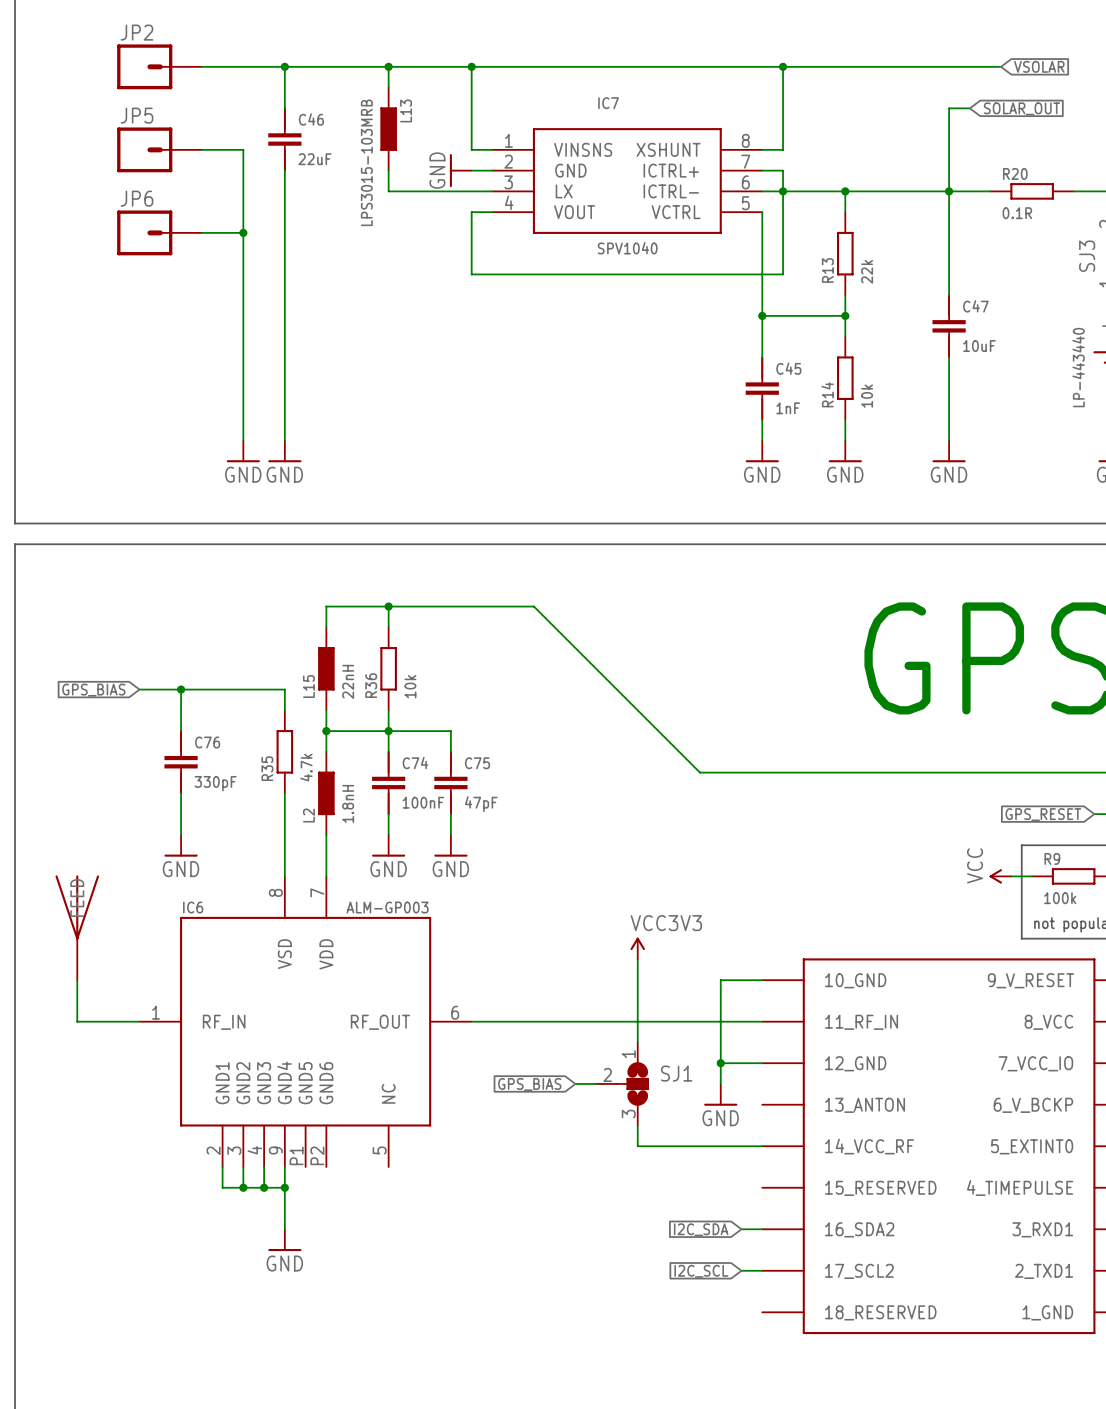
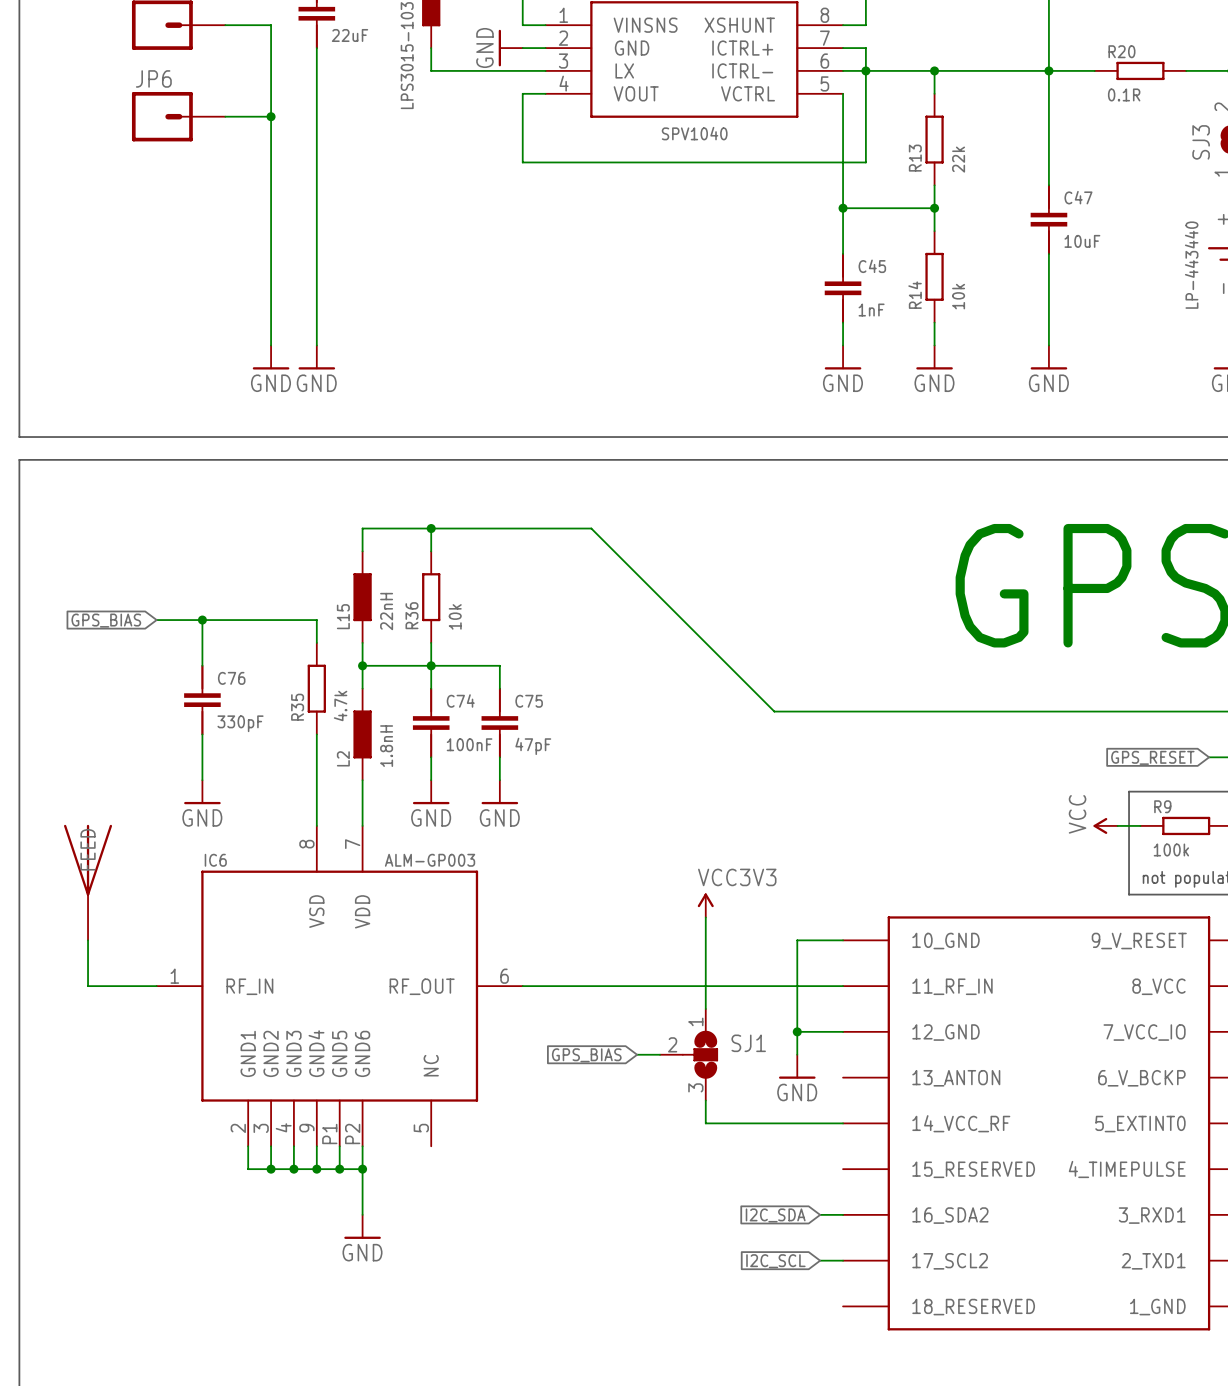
wire: none -> (339, 1146) (339, 1169)
wire: none -> (362, 1146) (362, 1214)
wire: (284, 1187) (284, 1229) -> (316, 1169) (362, 1169)
junction: none -> (339, 1169)
junction: none -> (362, 1169)
power symbol position: GND (284, 1240) -> GND (362, 1226)

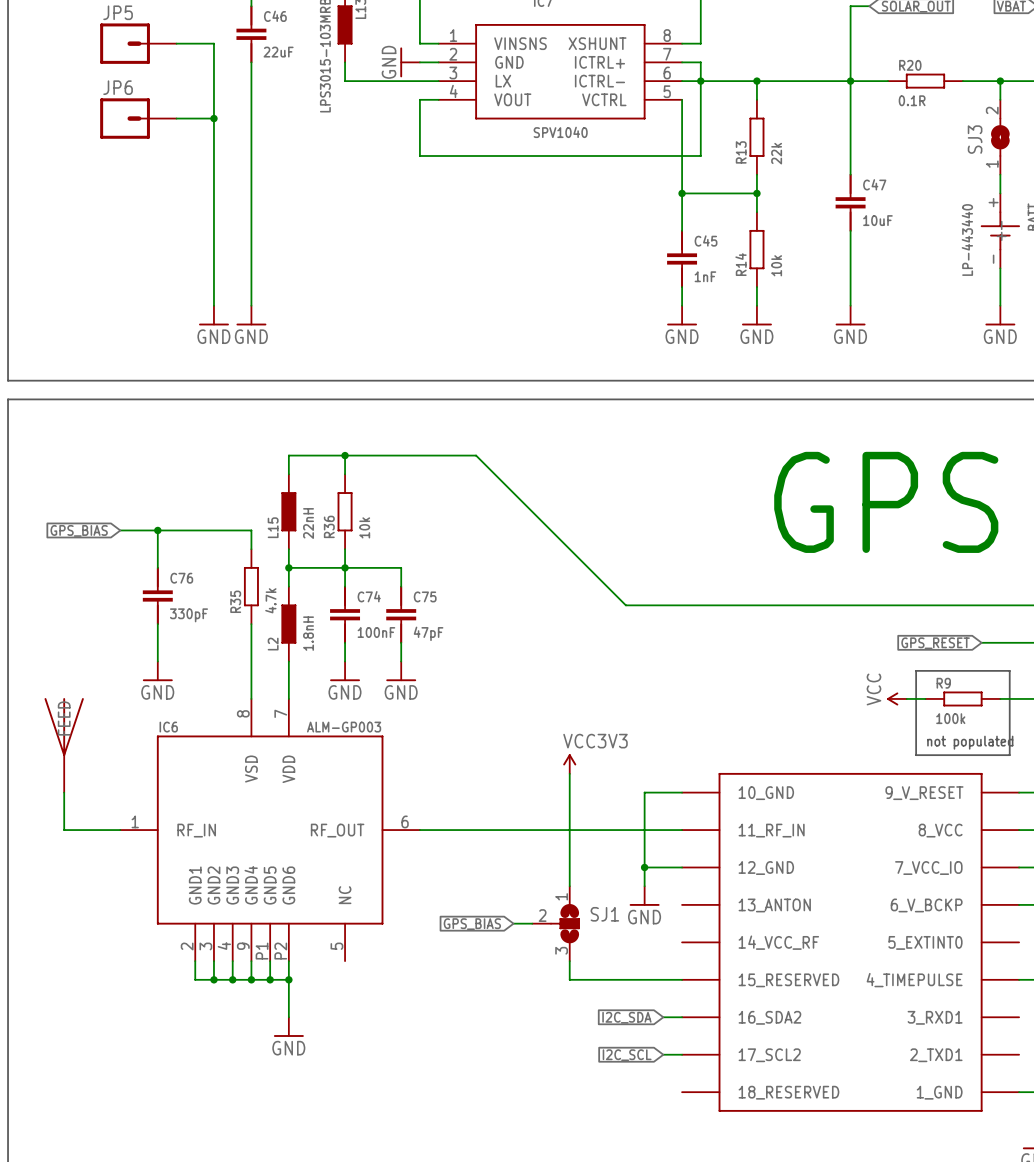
wire: (637, 1054) (660, 1054) -> (513, 923) (532, 923)
SJ1 position: (688, 1054) -> (555, 923)
global label position: GPS_BIAS (586, 1055) -> GPS_BIAS (472, 924)
wire: (705, 1100) (705, 1123) (843, 1123) -> (569, 961) (569, 979) (682, 979)

